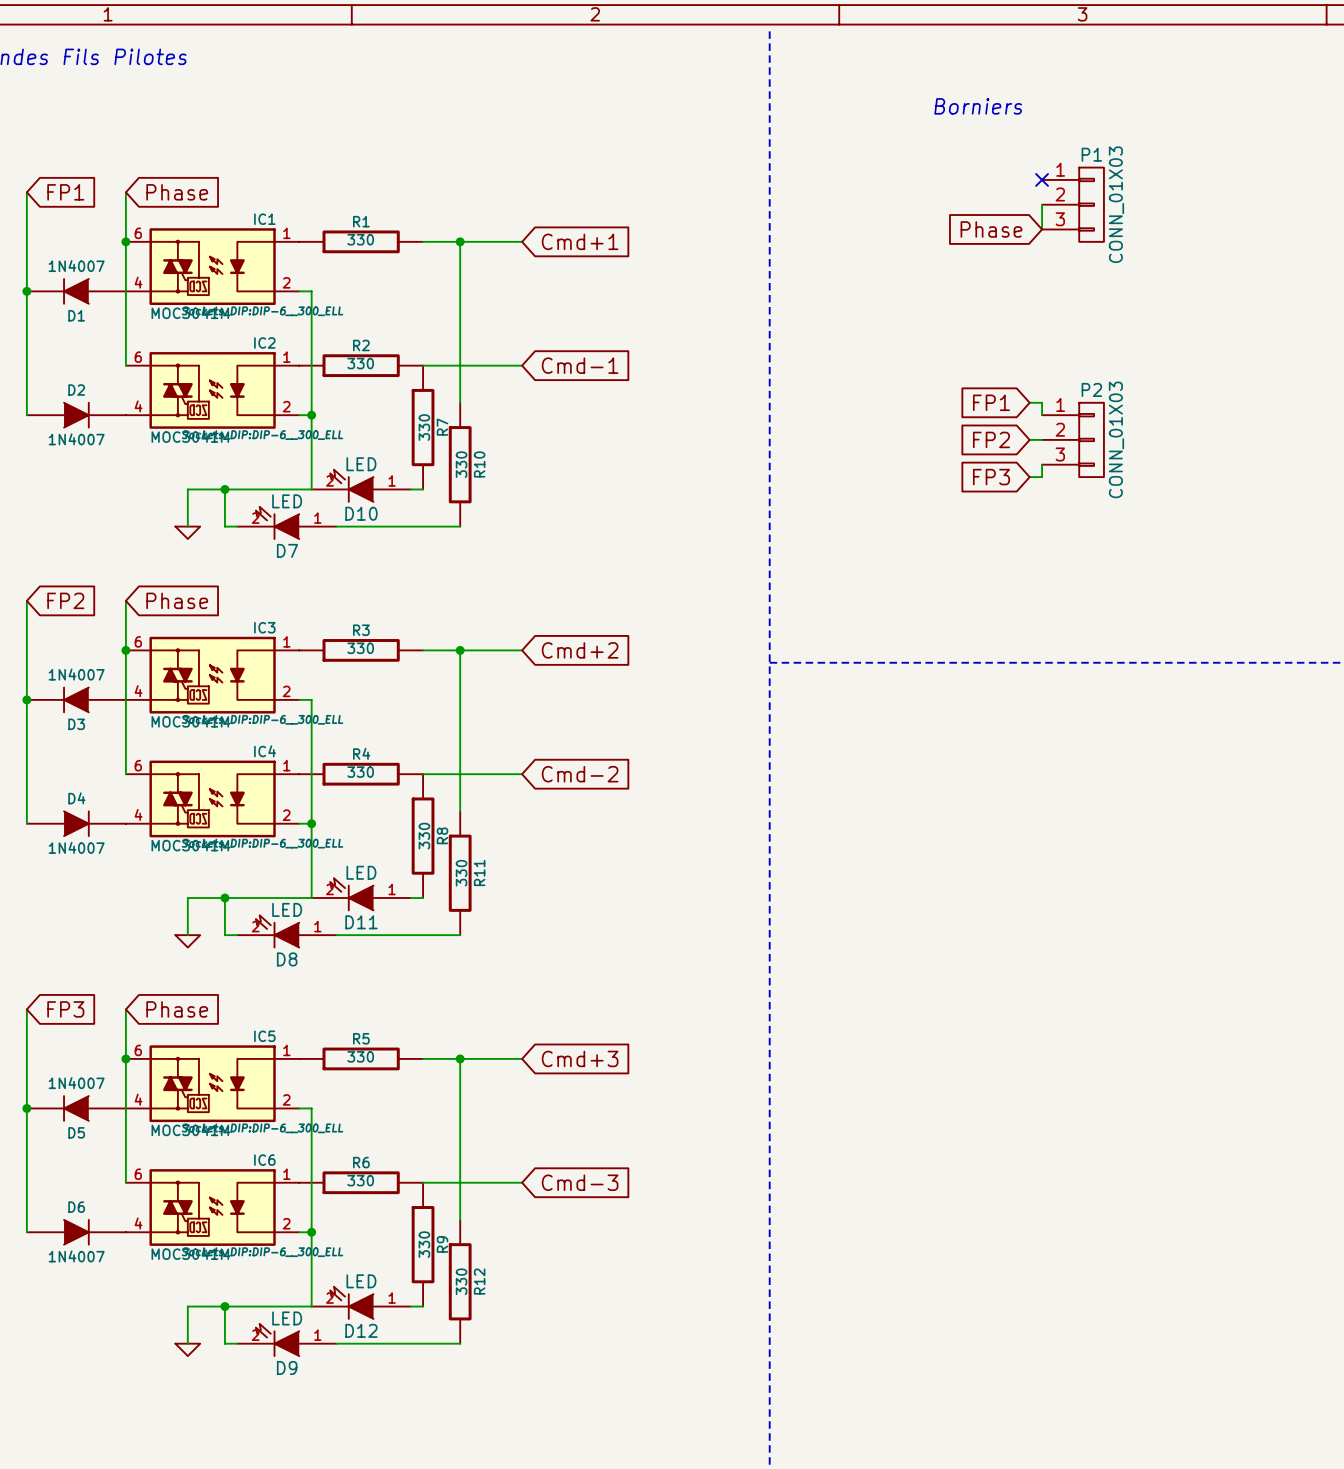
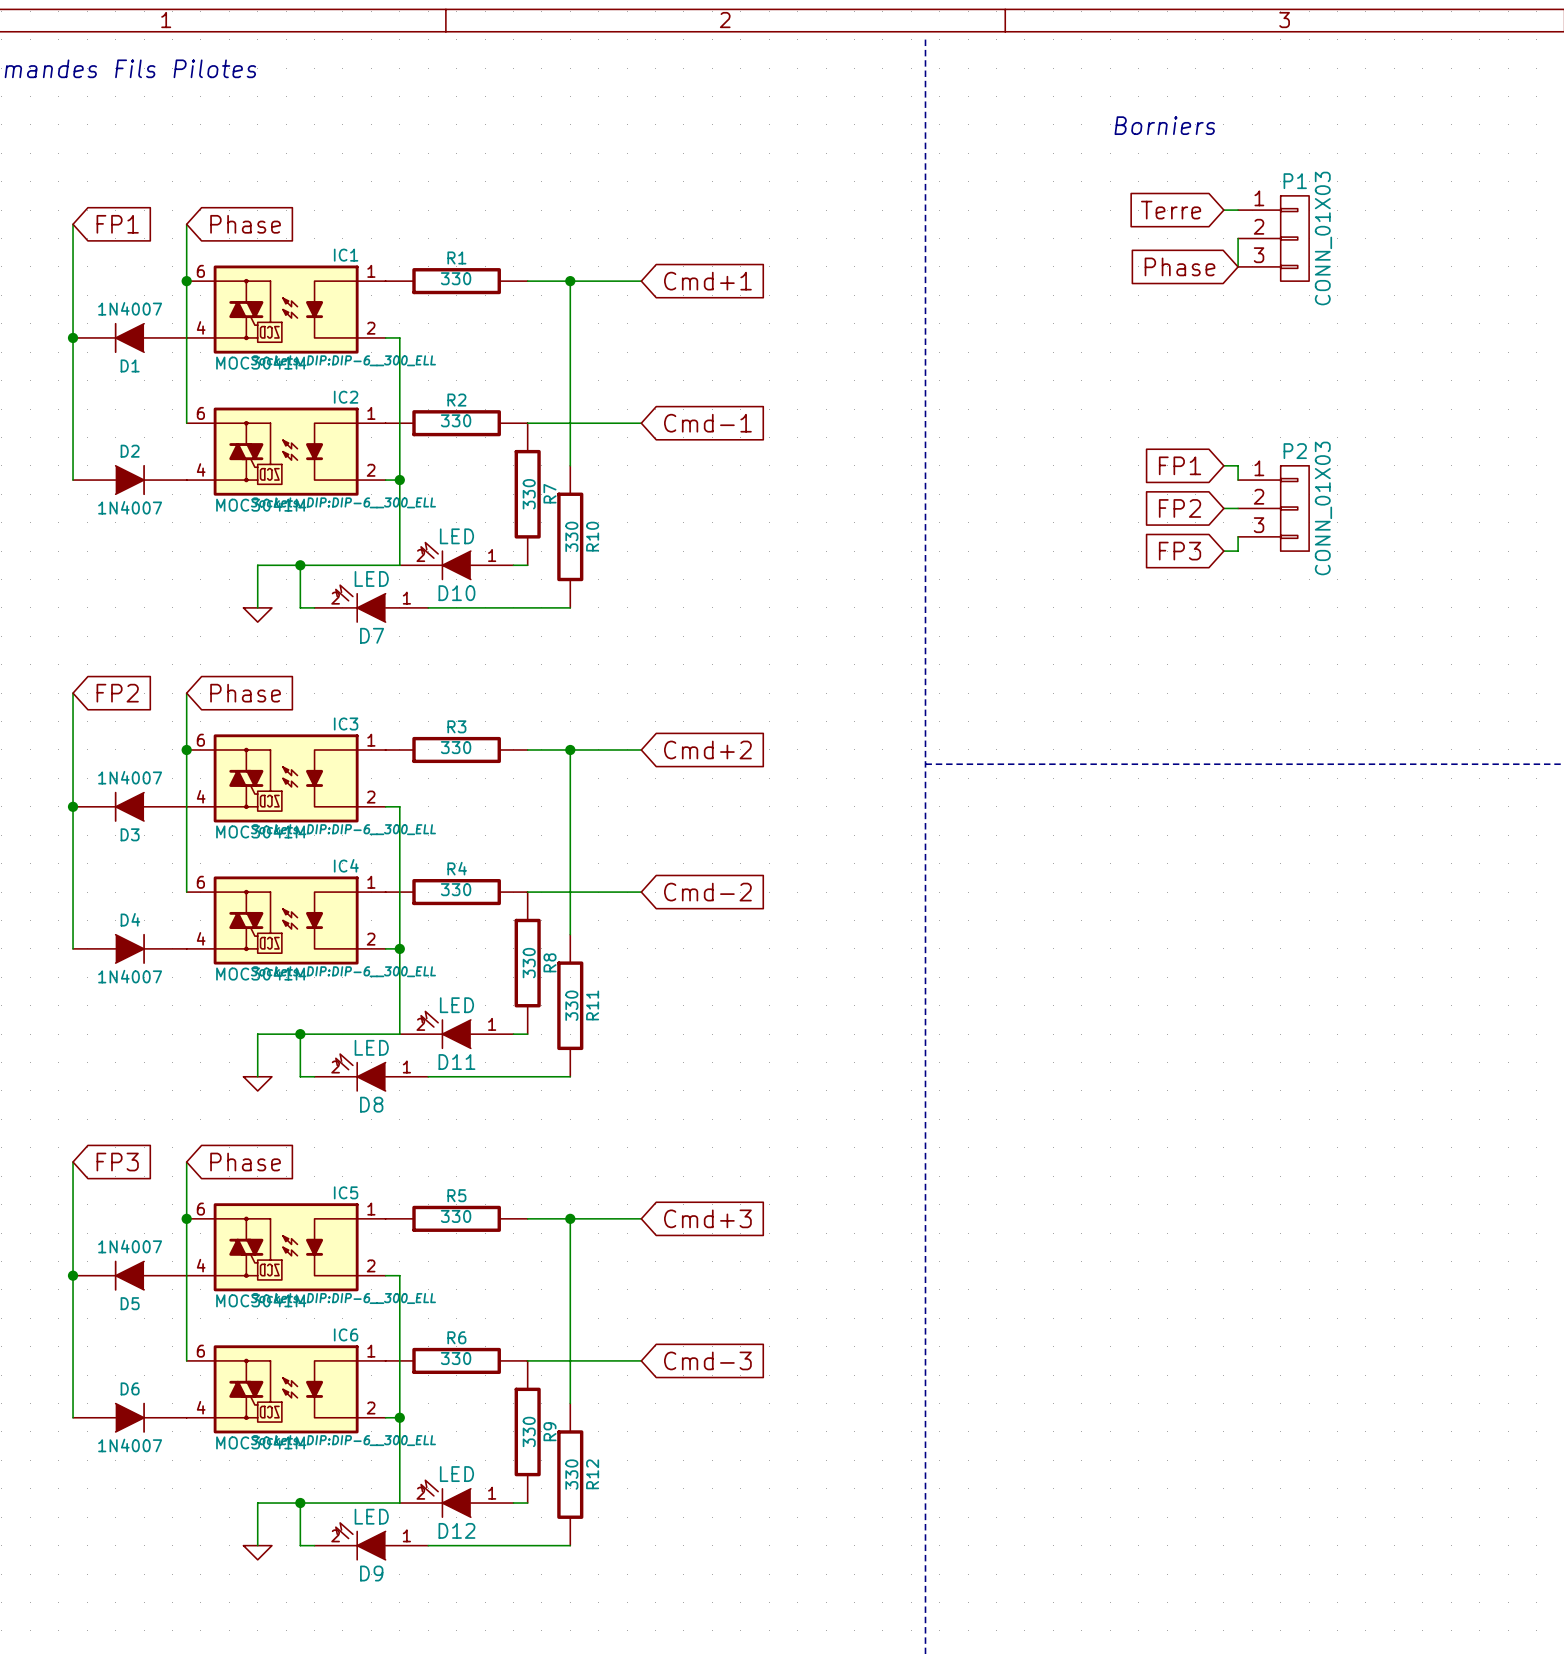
global label: none -> Terre (1171, 210)
wire: none -> (1223, 210) (1238, 210)
no-connect mark: (1042, 179) -> none

